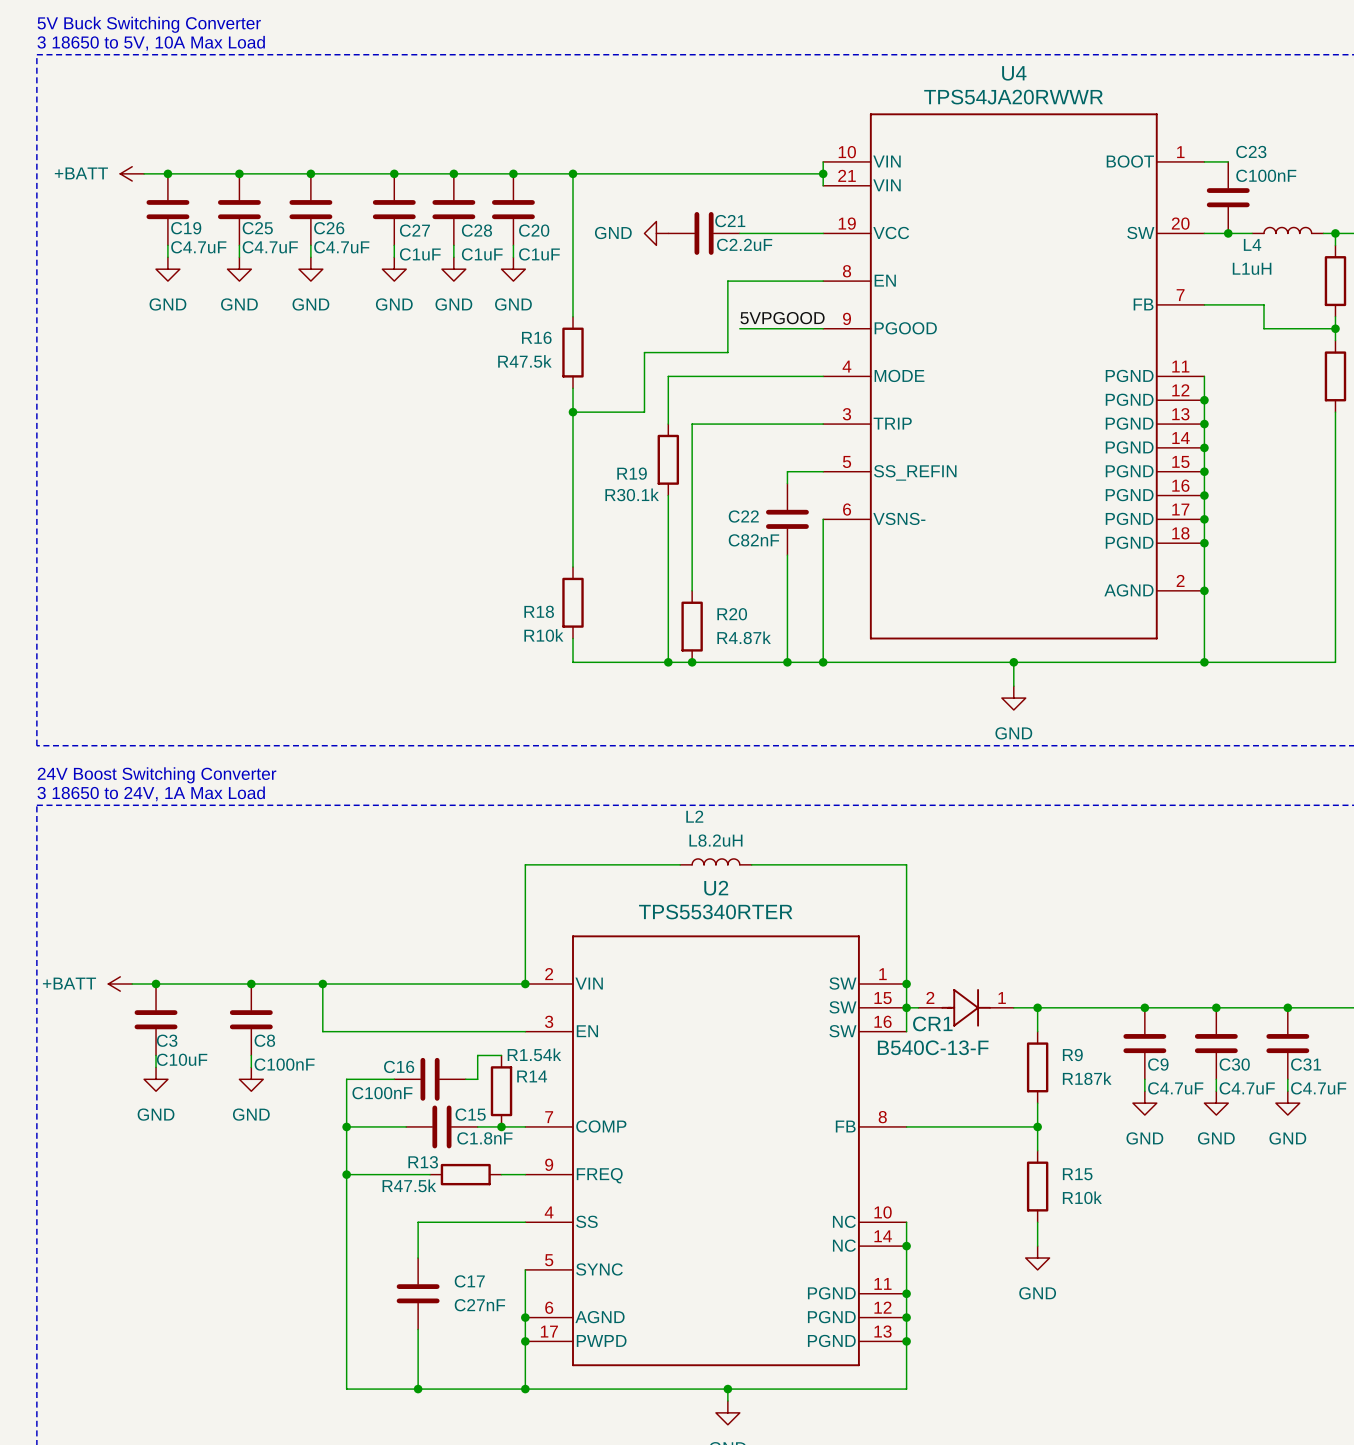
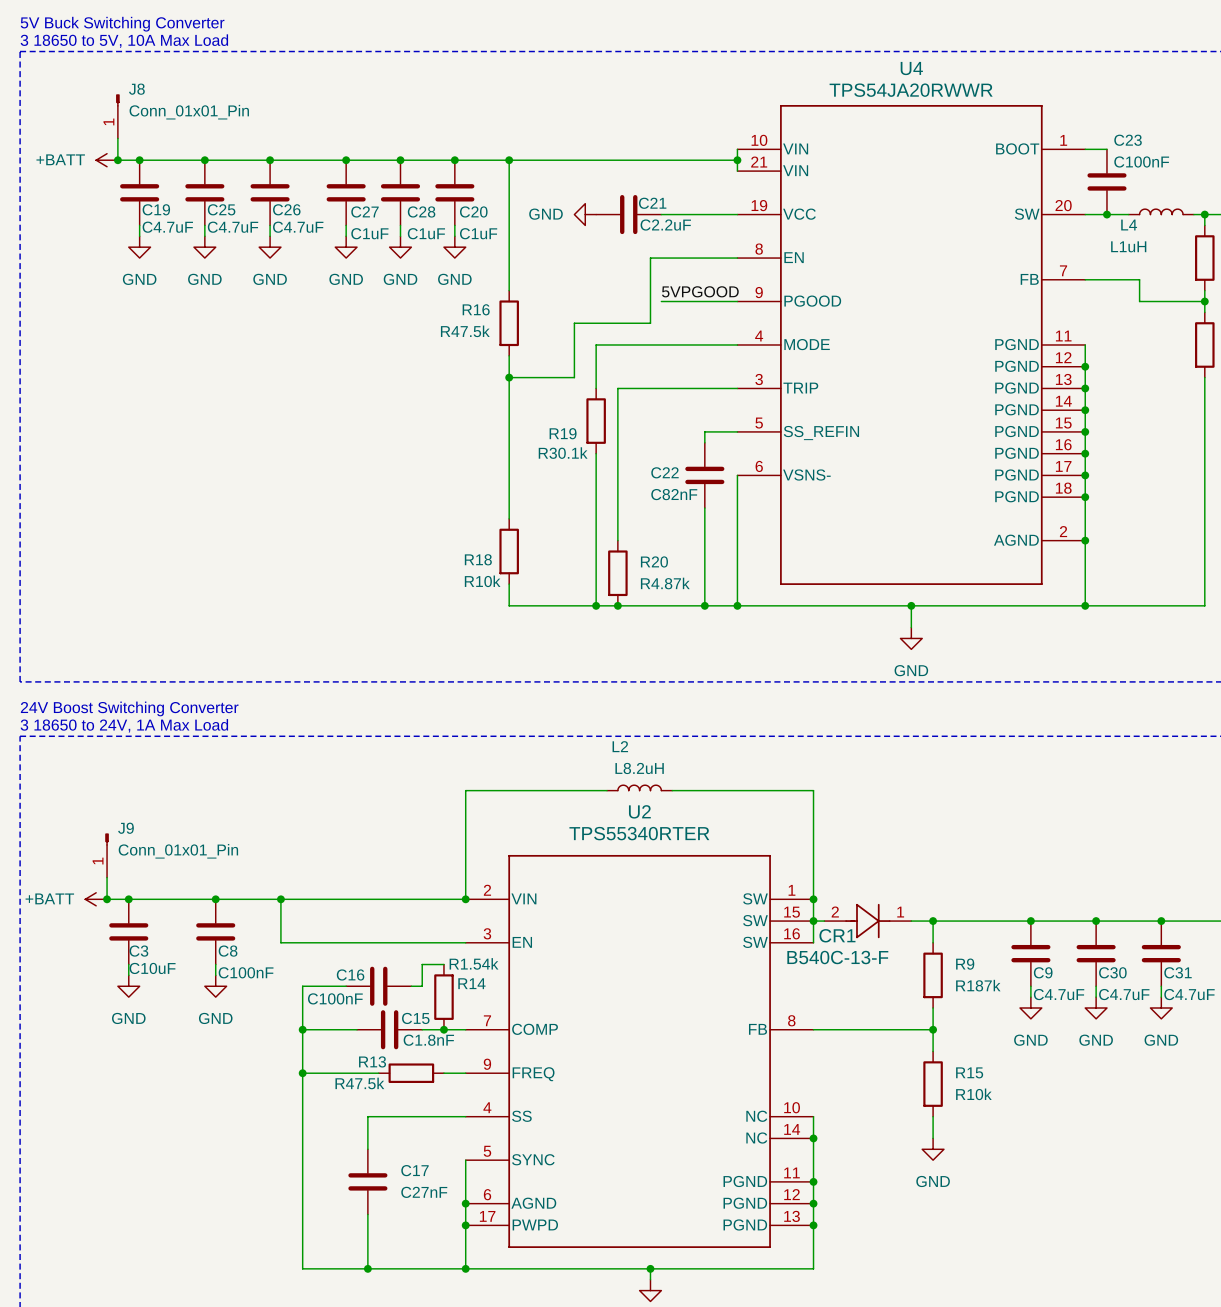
J8: none -> Conn_01x01_Pin (117, 116)
wire: none -> (117, 138) (117, 160)
junction: none -> (117, 160)
J9: none -> Conn_01x01_Pin (107, 855)
wire: none -> (107, 877) (107, 899)
junction: none -> (107, 899)

